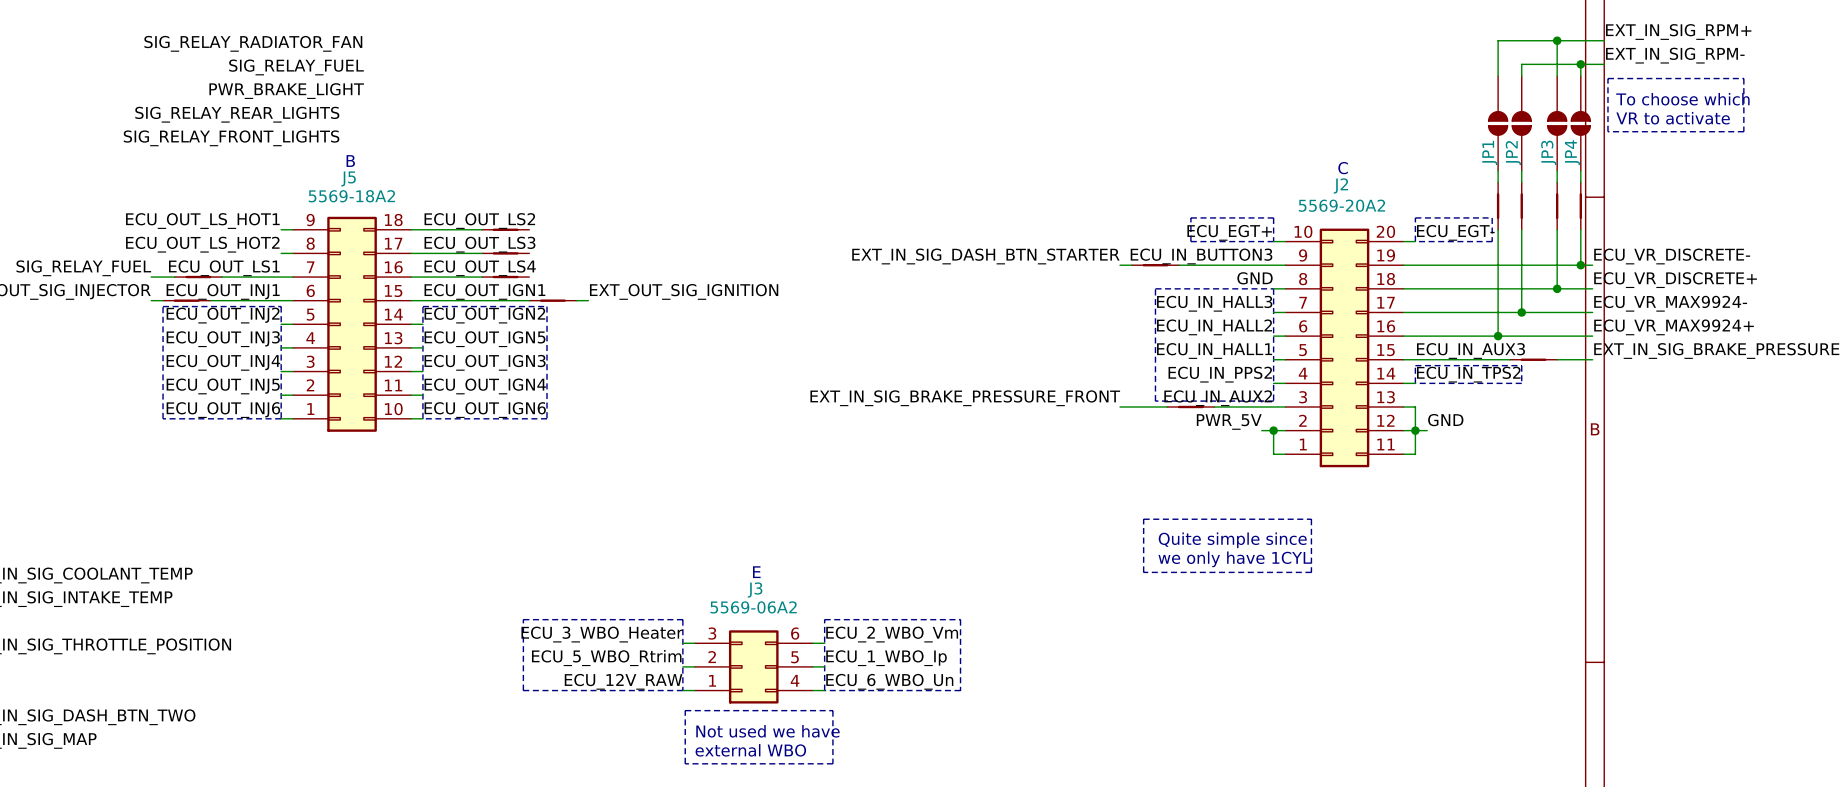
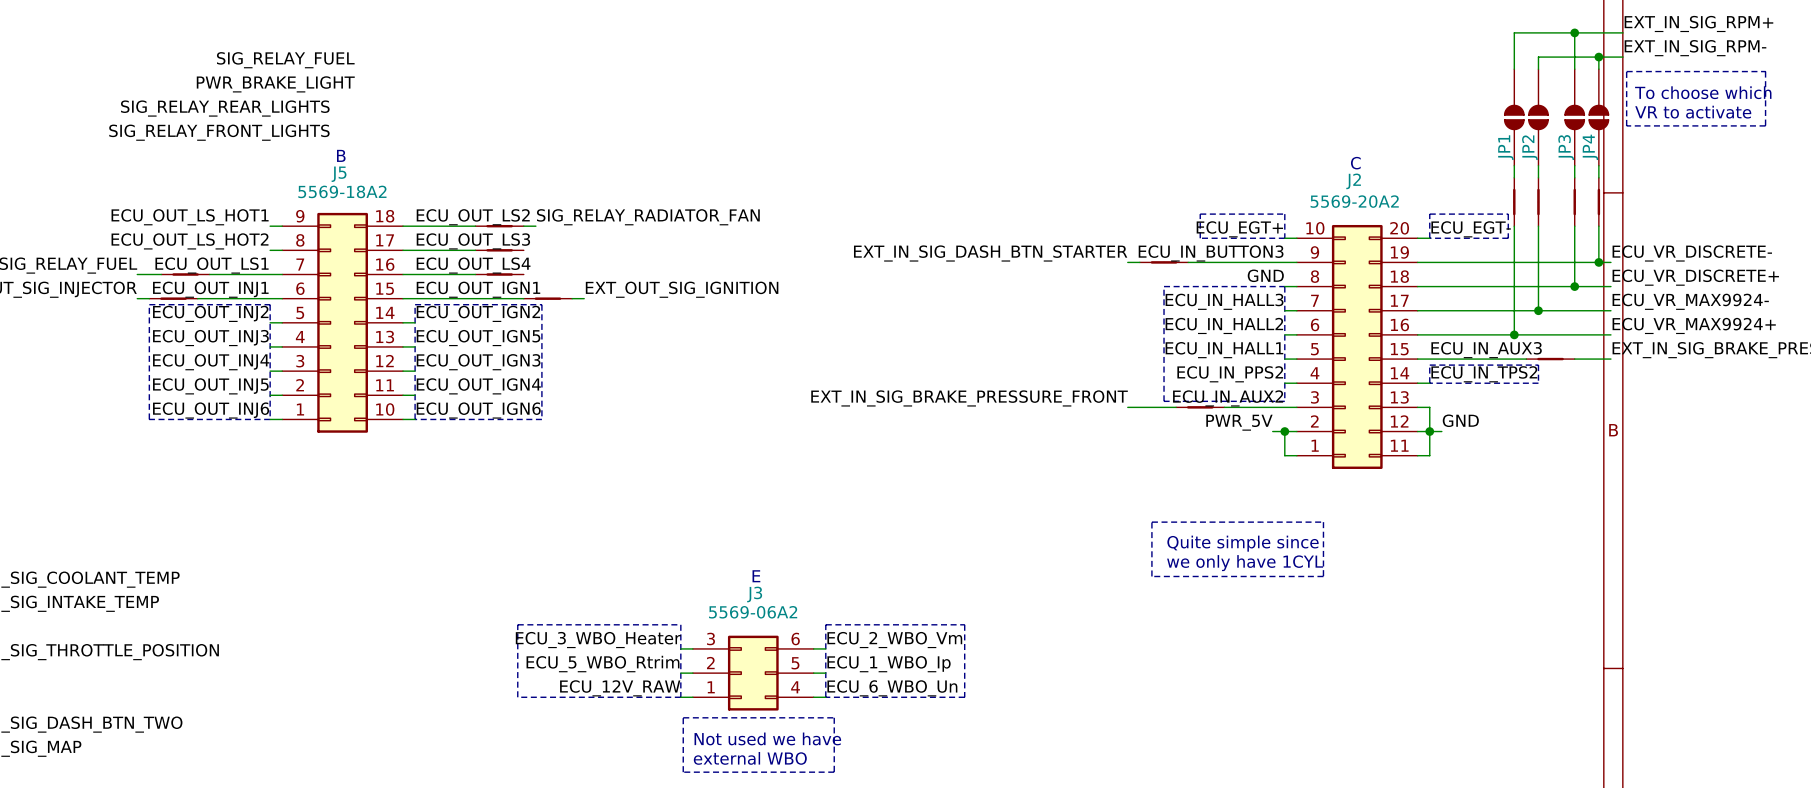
label: SIG_RELAY_RADIATOR_FAN (253, 43) -> none
label: none -> SIG_RELAY_RADIATOR_FAN (648, 217)
wire: none -> (523, 226) (535, 226)

